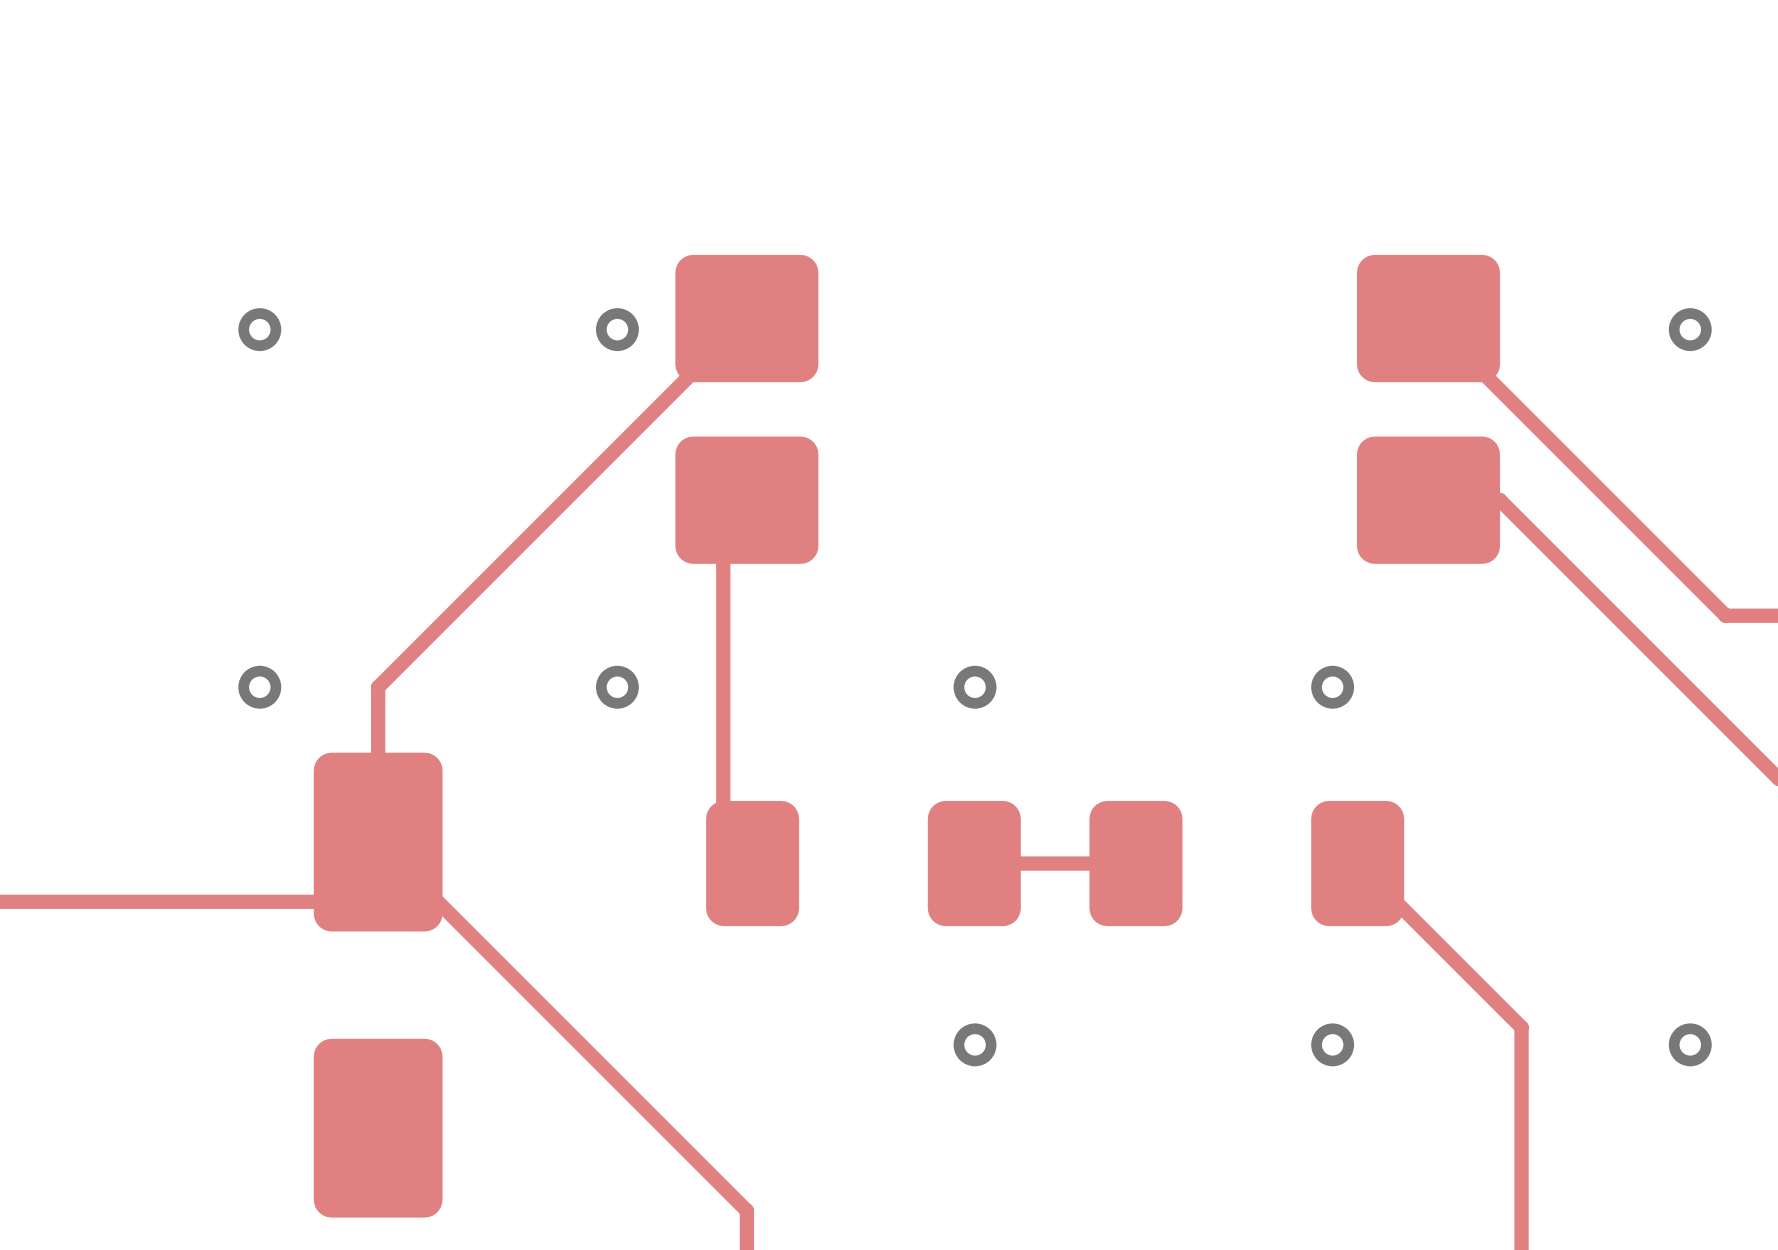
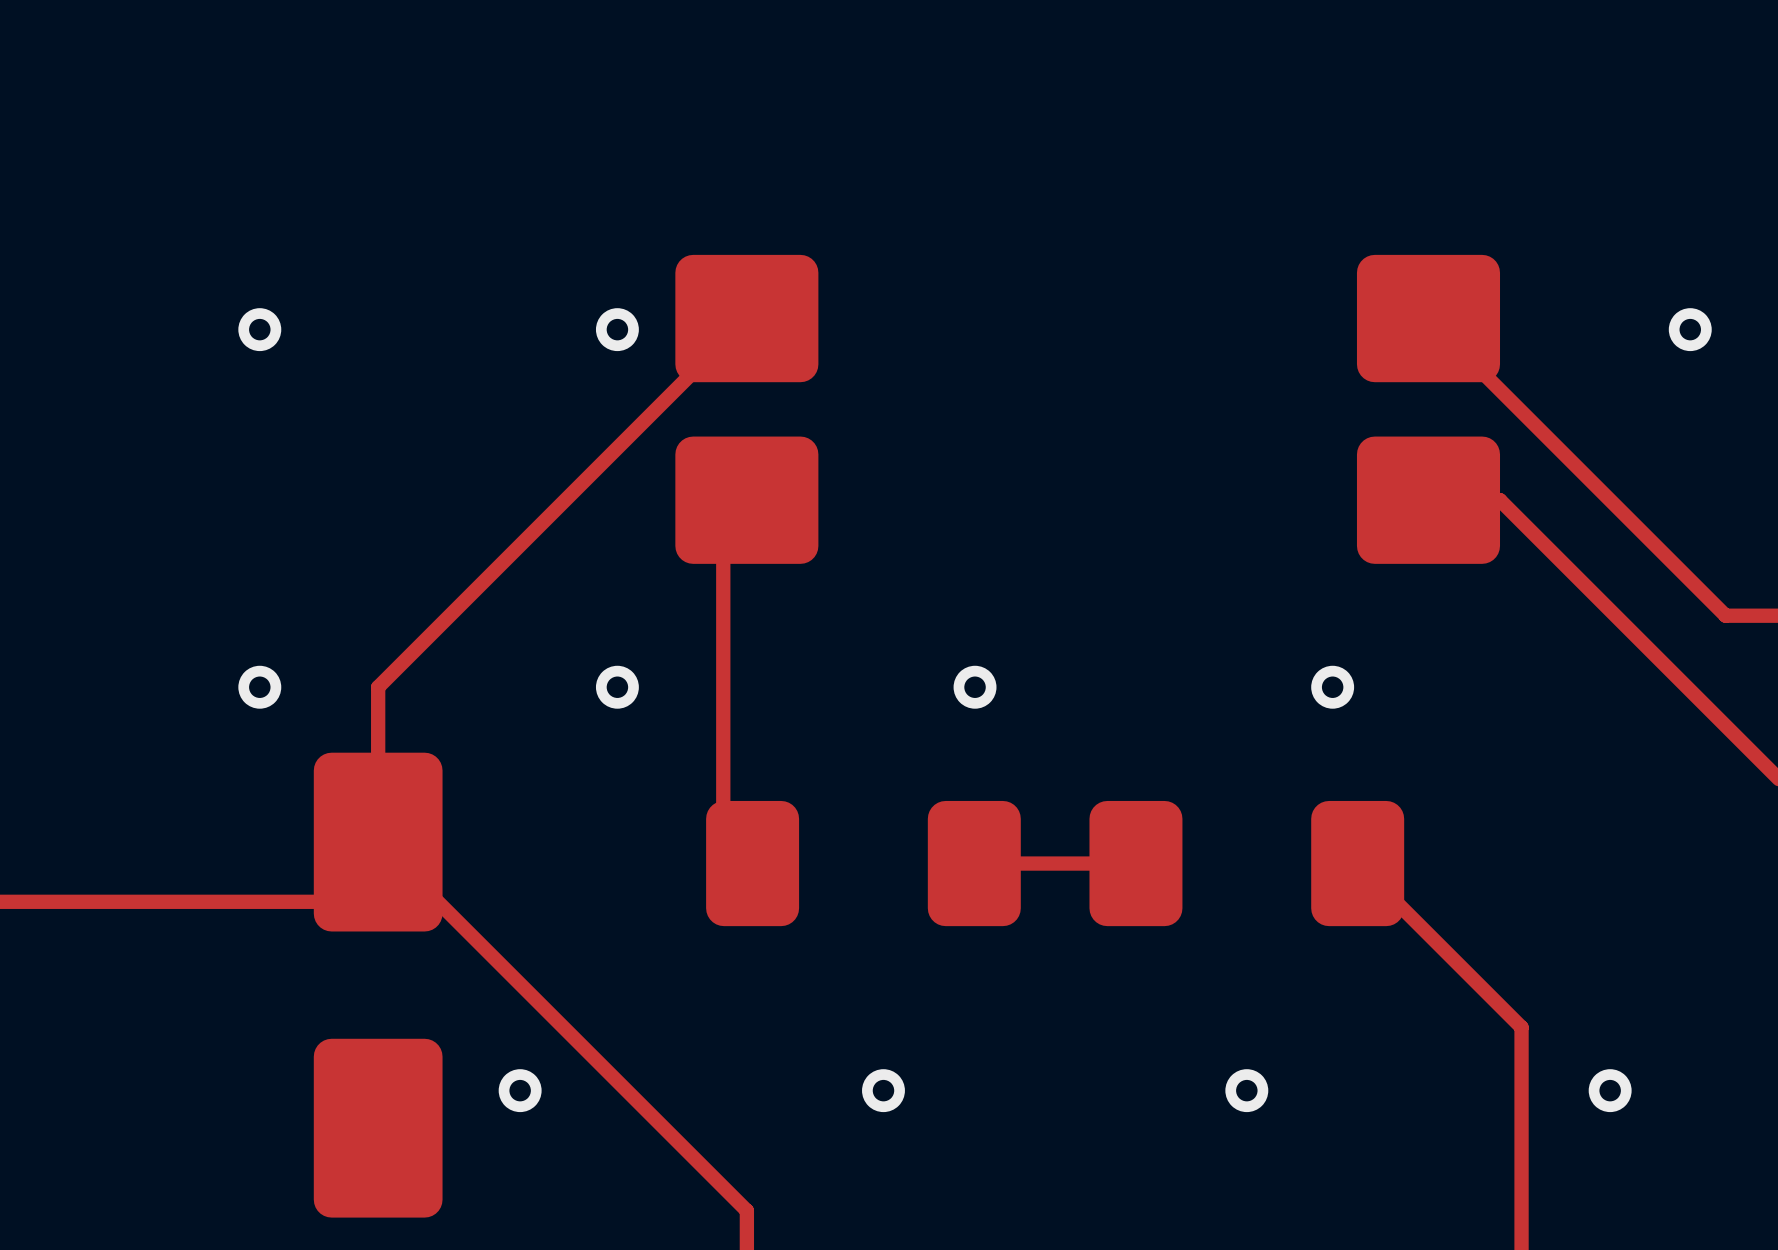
via position: (975, 1044) -> (883, 1090)
via position: (1332, 1044) -> (1246, 1090)
via position: (1690, 1044) -> (1610, 1090)
via: none -> (520, 1090)

